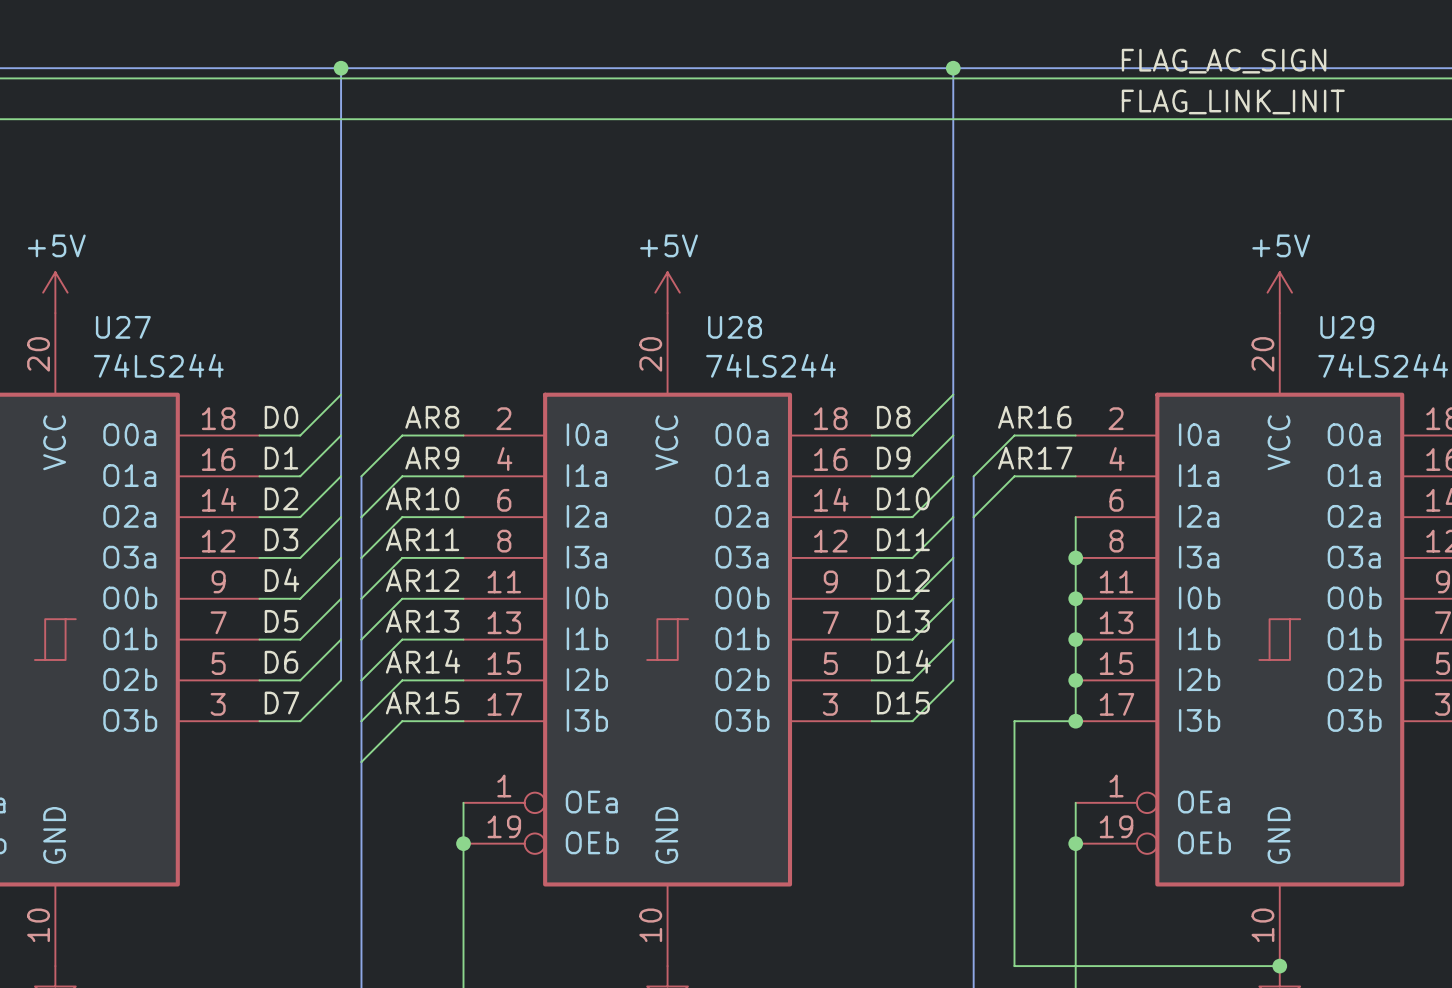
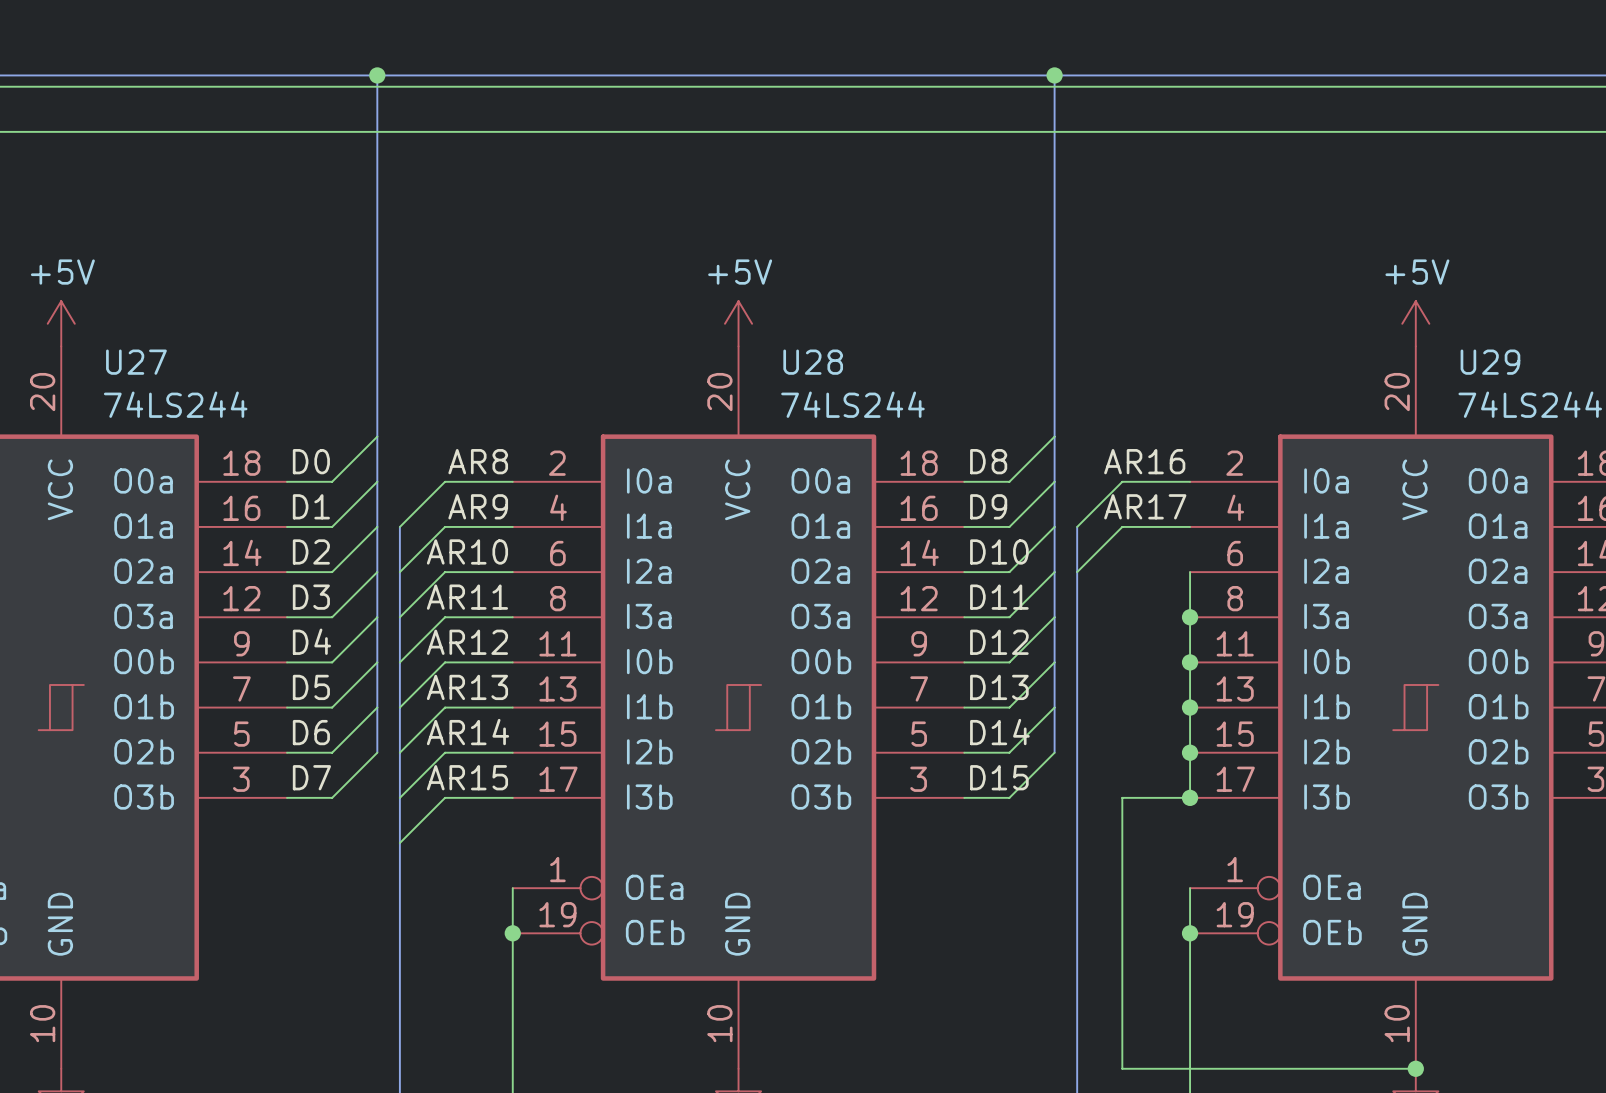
label: FLAG_AC_SIGN (1224, 61) -> none
label: FLAG_LINK_INIT (1233, 101) -> none

